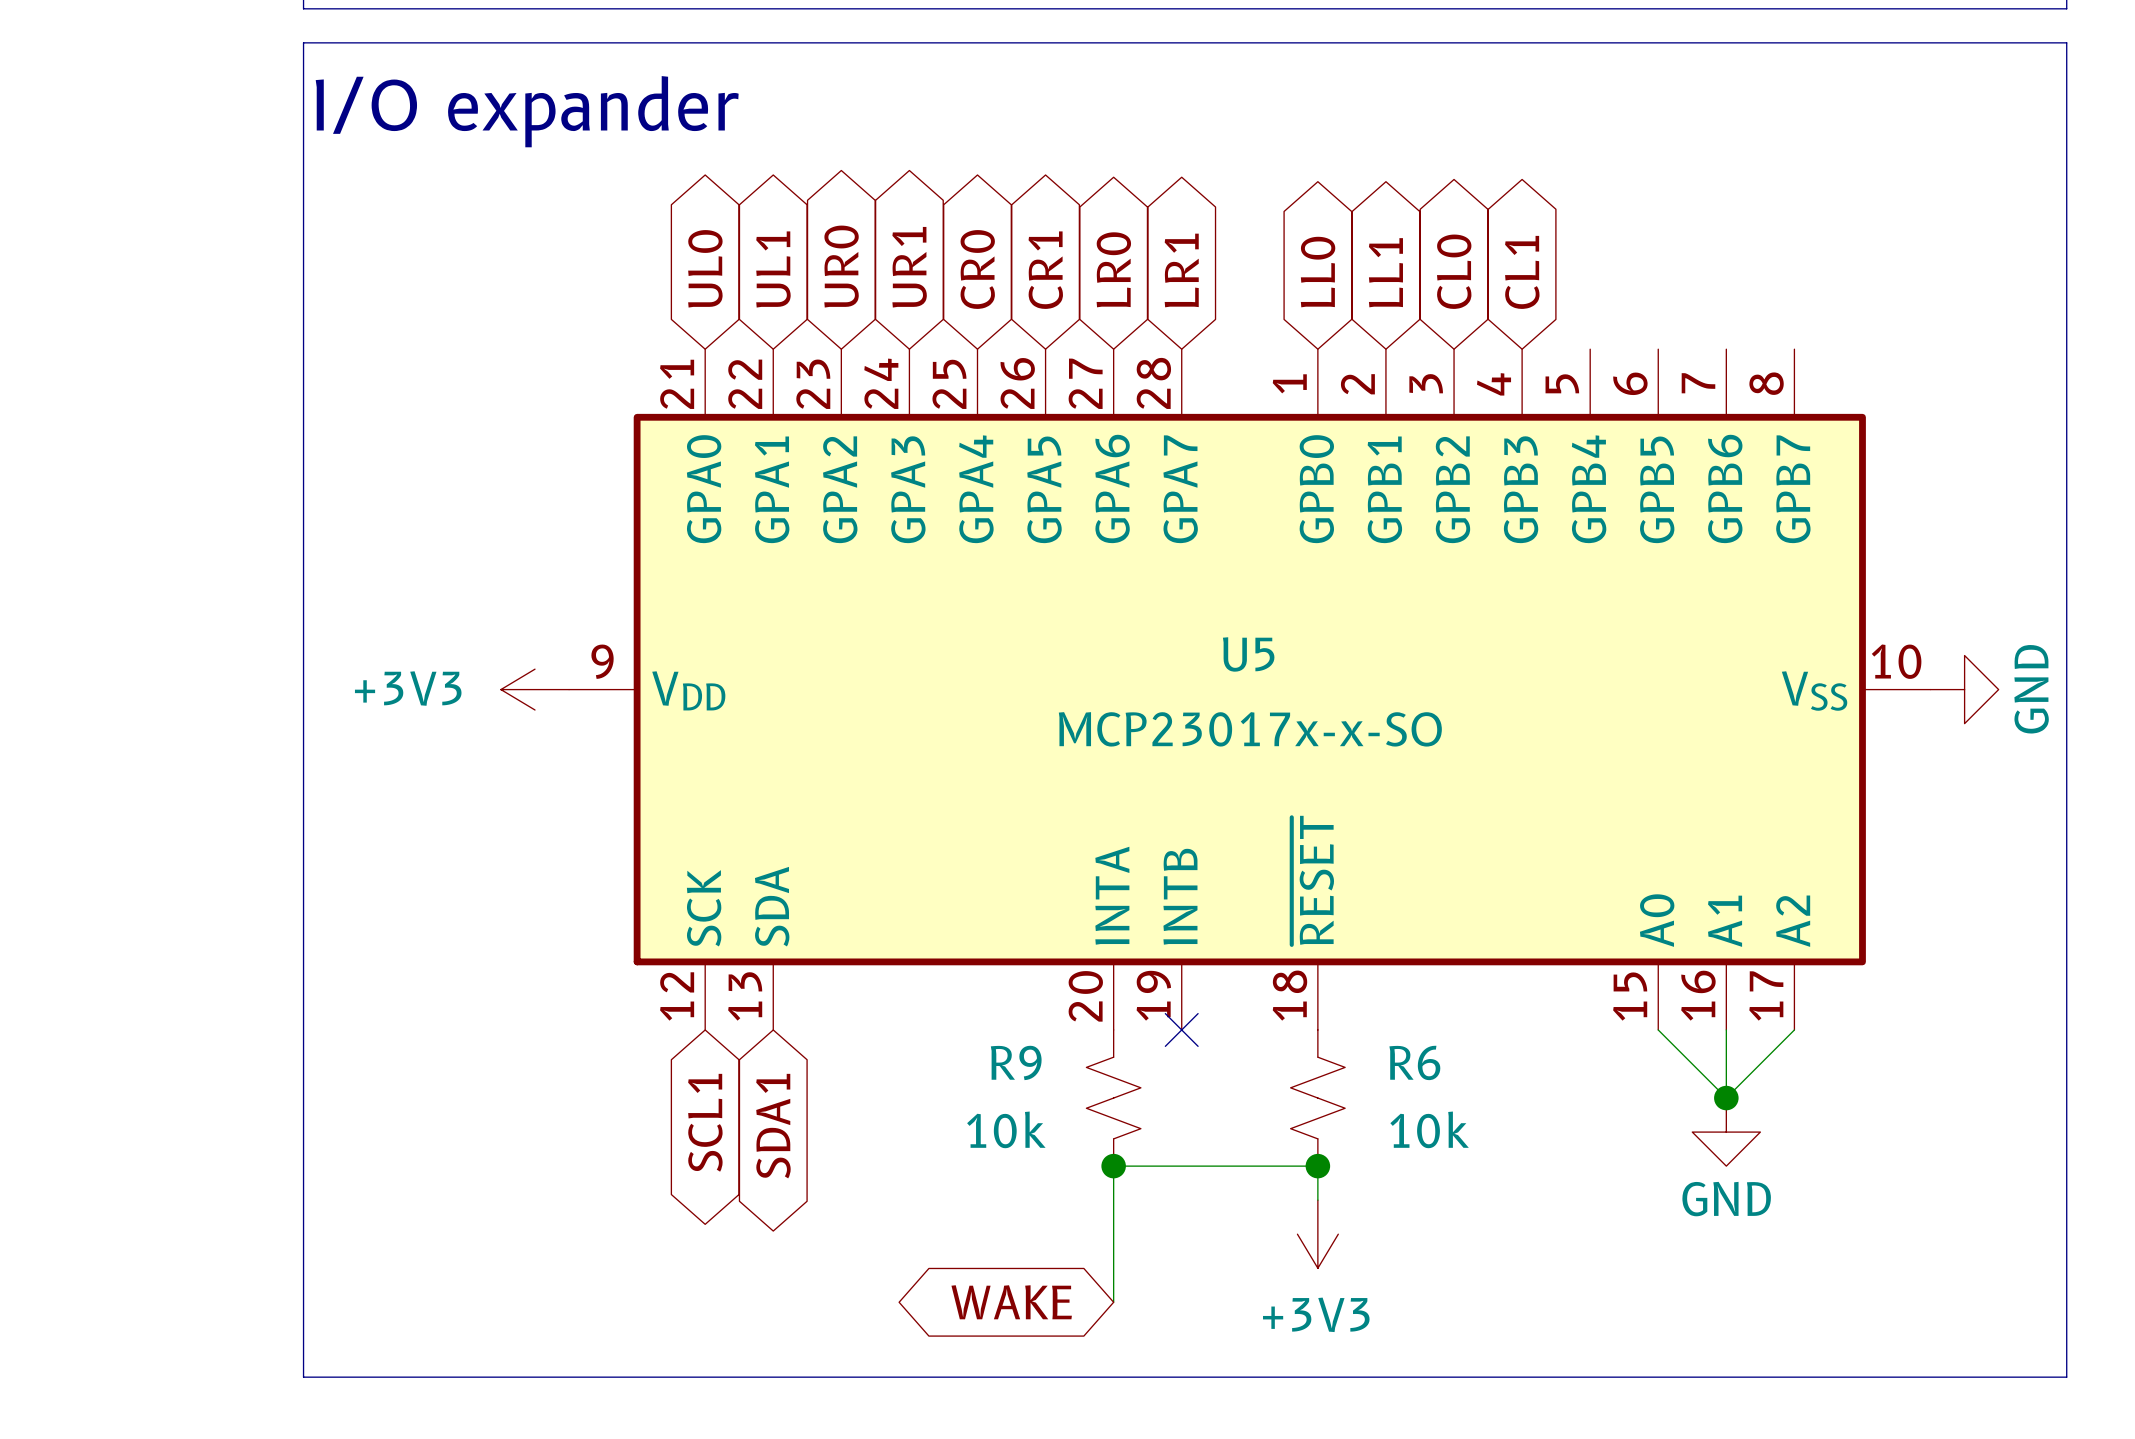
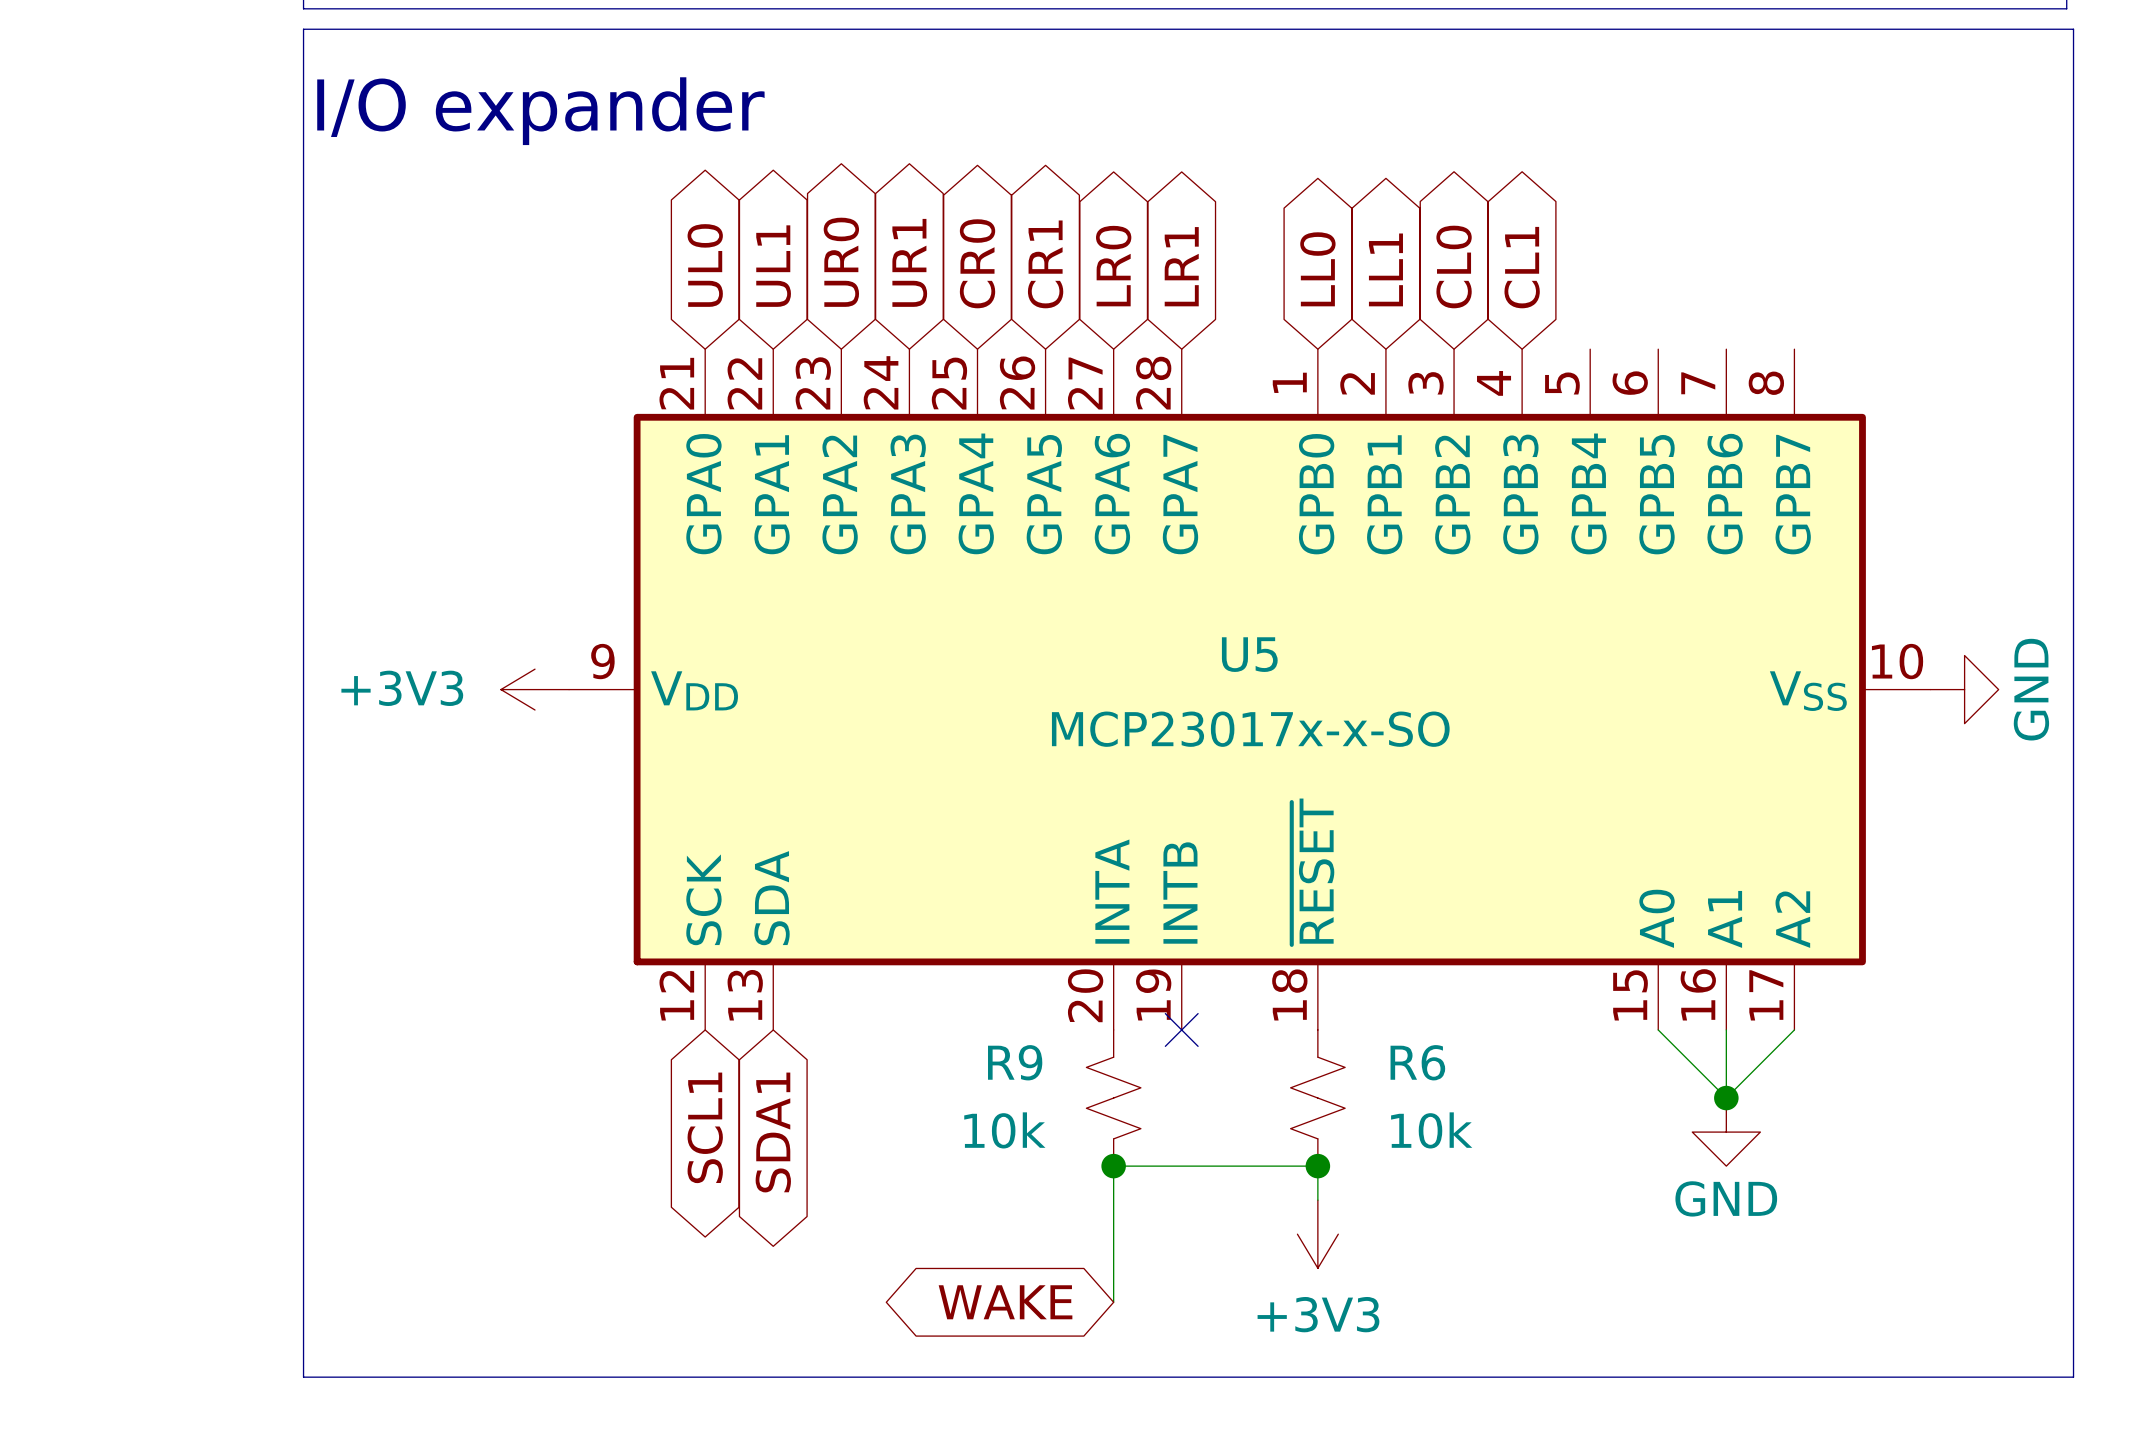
line: (303, 42) (2066, 42) (2066, 1377) -> (303, 42) (303, 29) (2073, 29) (2073, 1377) (2066, 1377)

